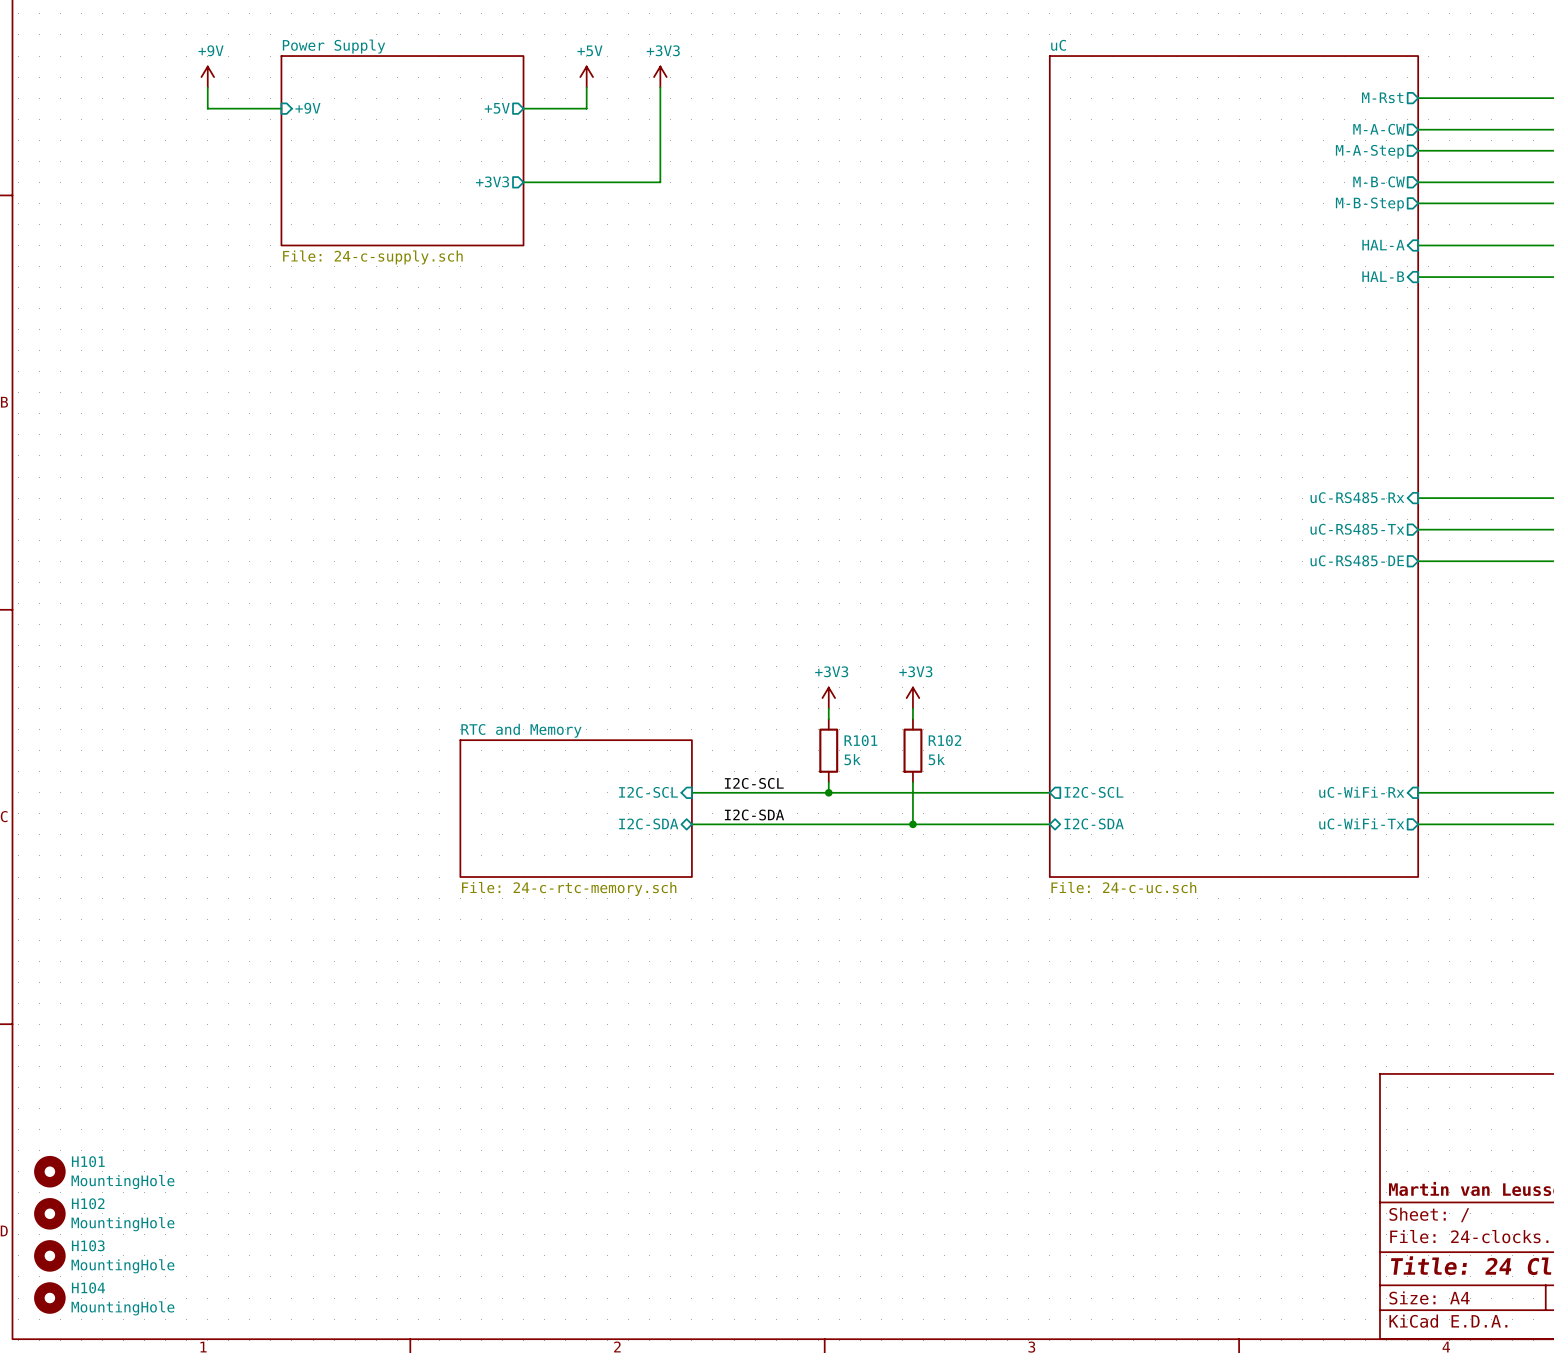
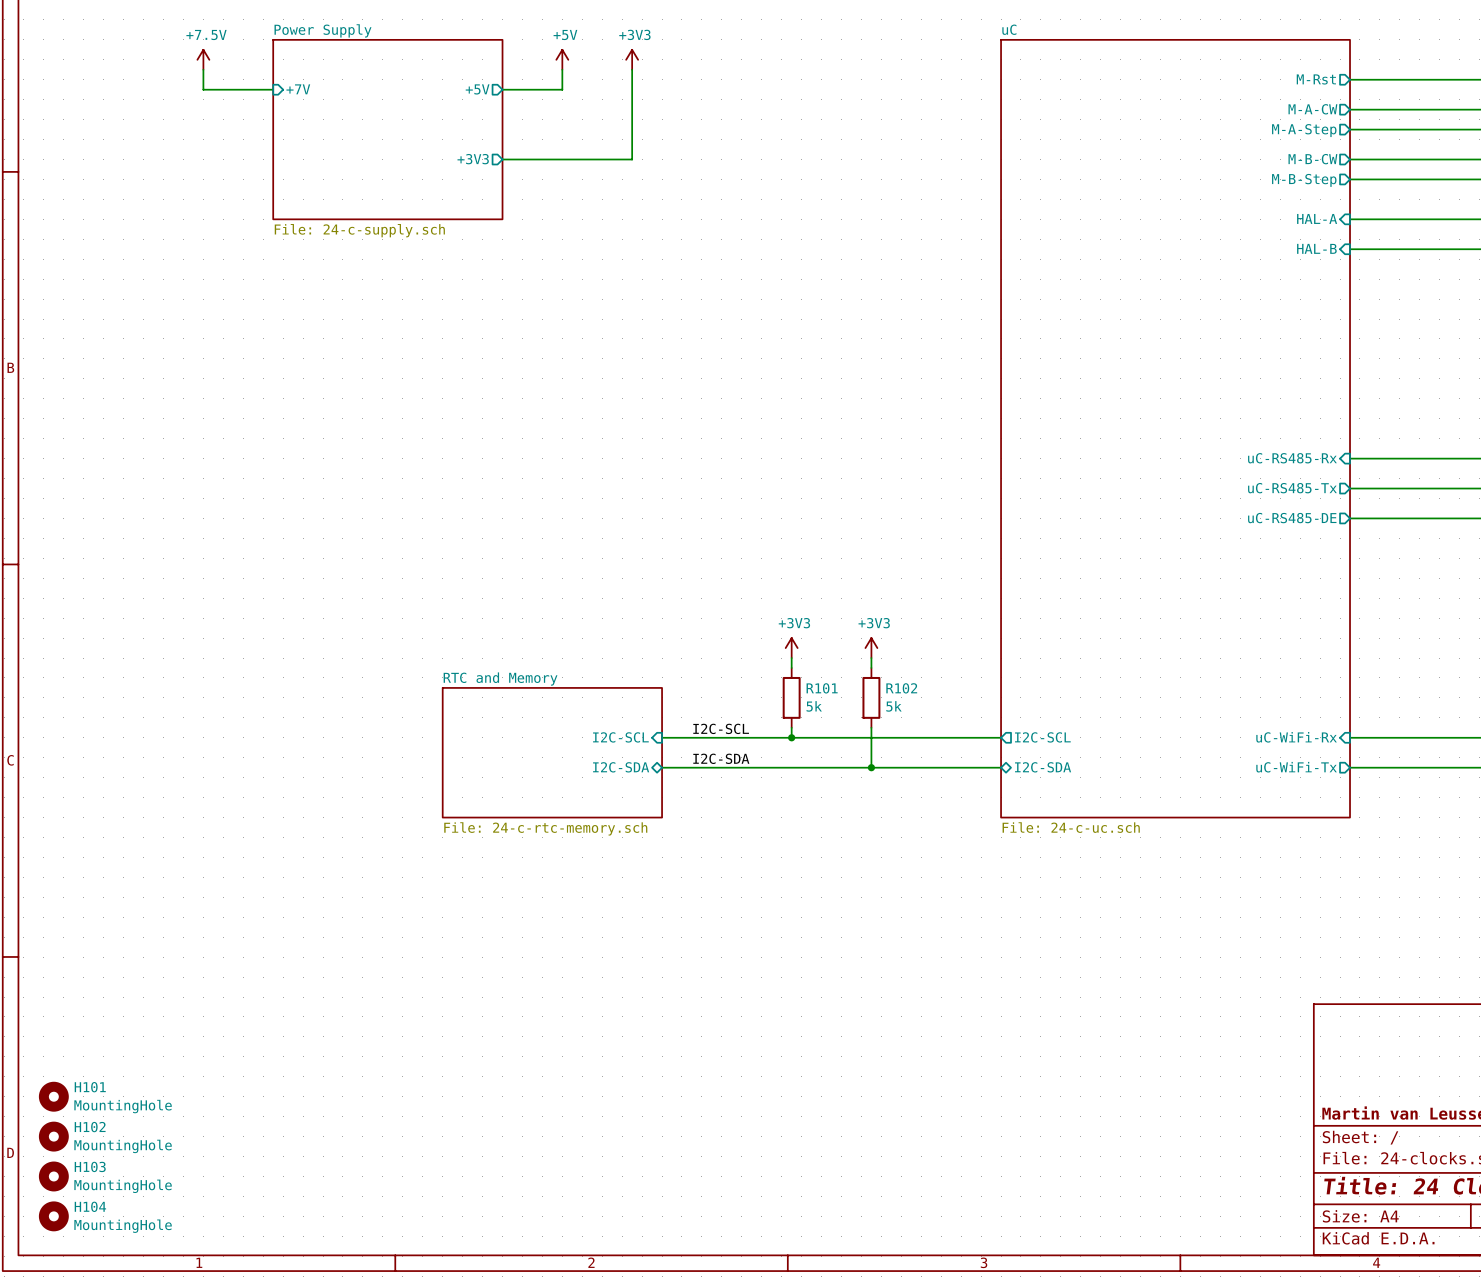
power symbol: +9V (207, 77) -> +7.5V (203, 59)
sheet pin: +9V (307, 108) -> +7V (298, 89)

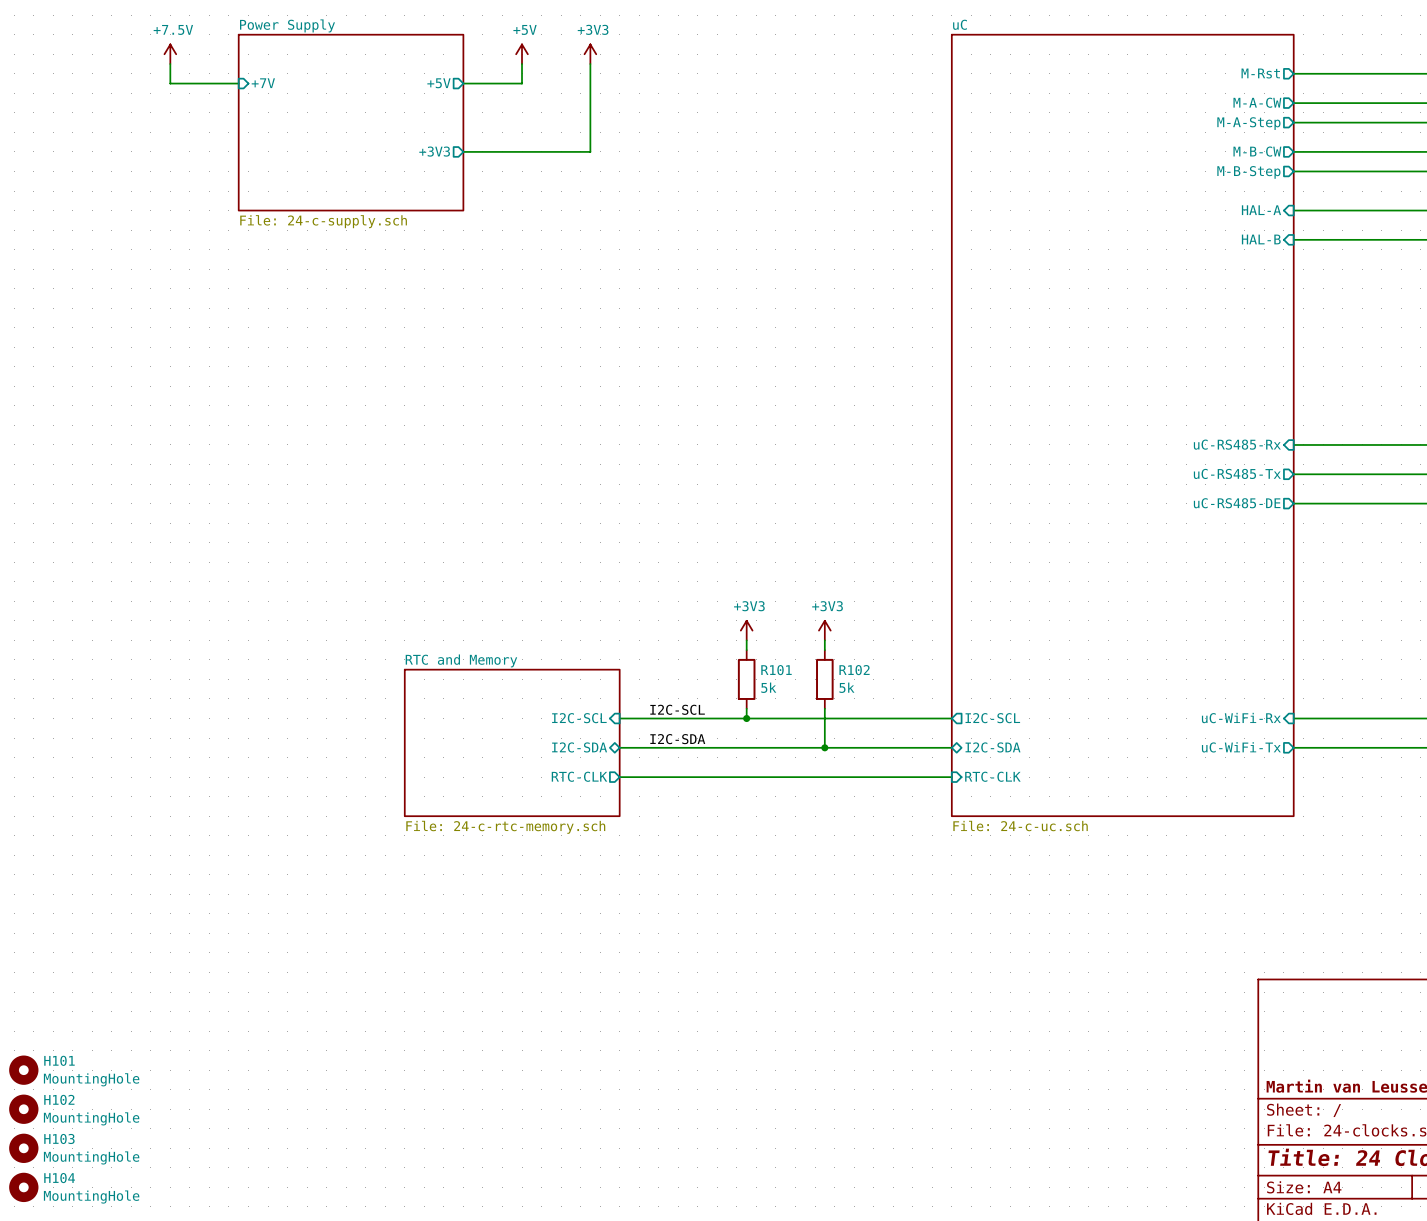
sheet uC: File: 24-c-uc.sch (1175, 428) -> none
sheet uC: none -> File: 24-c-uc.sch (1122, 425)
sheet RTC and Memory: File: 24-c-rtc-memory.sch (552, 752) -> none
sheet RTC and Memory: none -> File: 24-c-rtc-memory.sch (512, 742)
sheet pin: none -> RTC-CLK (579, 776)
wire: none -> (619, 777) (951, 777)
sheet pin: none -> RTC-CLK (992, 776)

